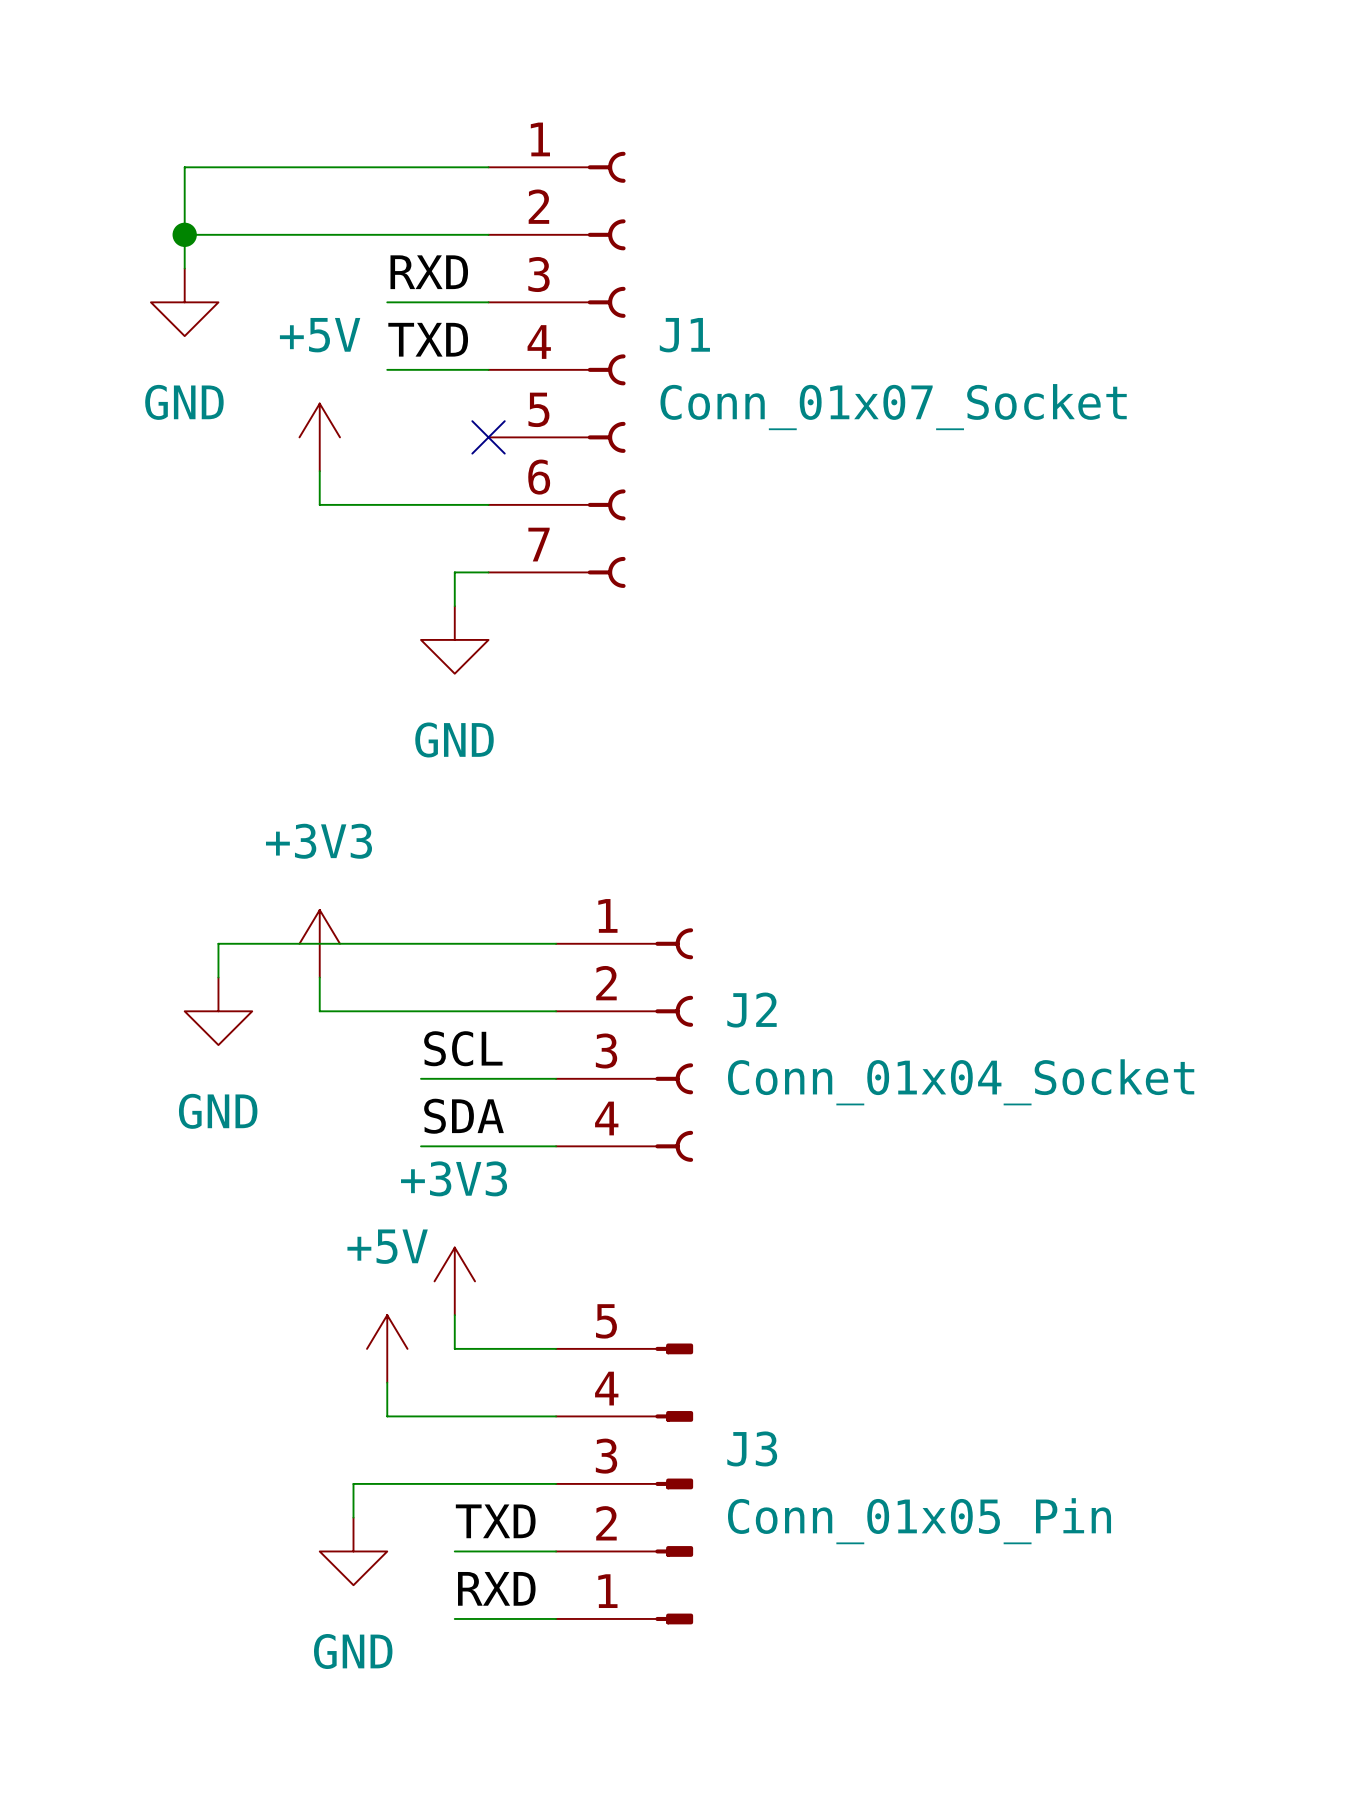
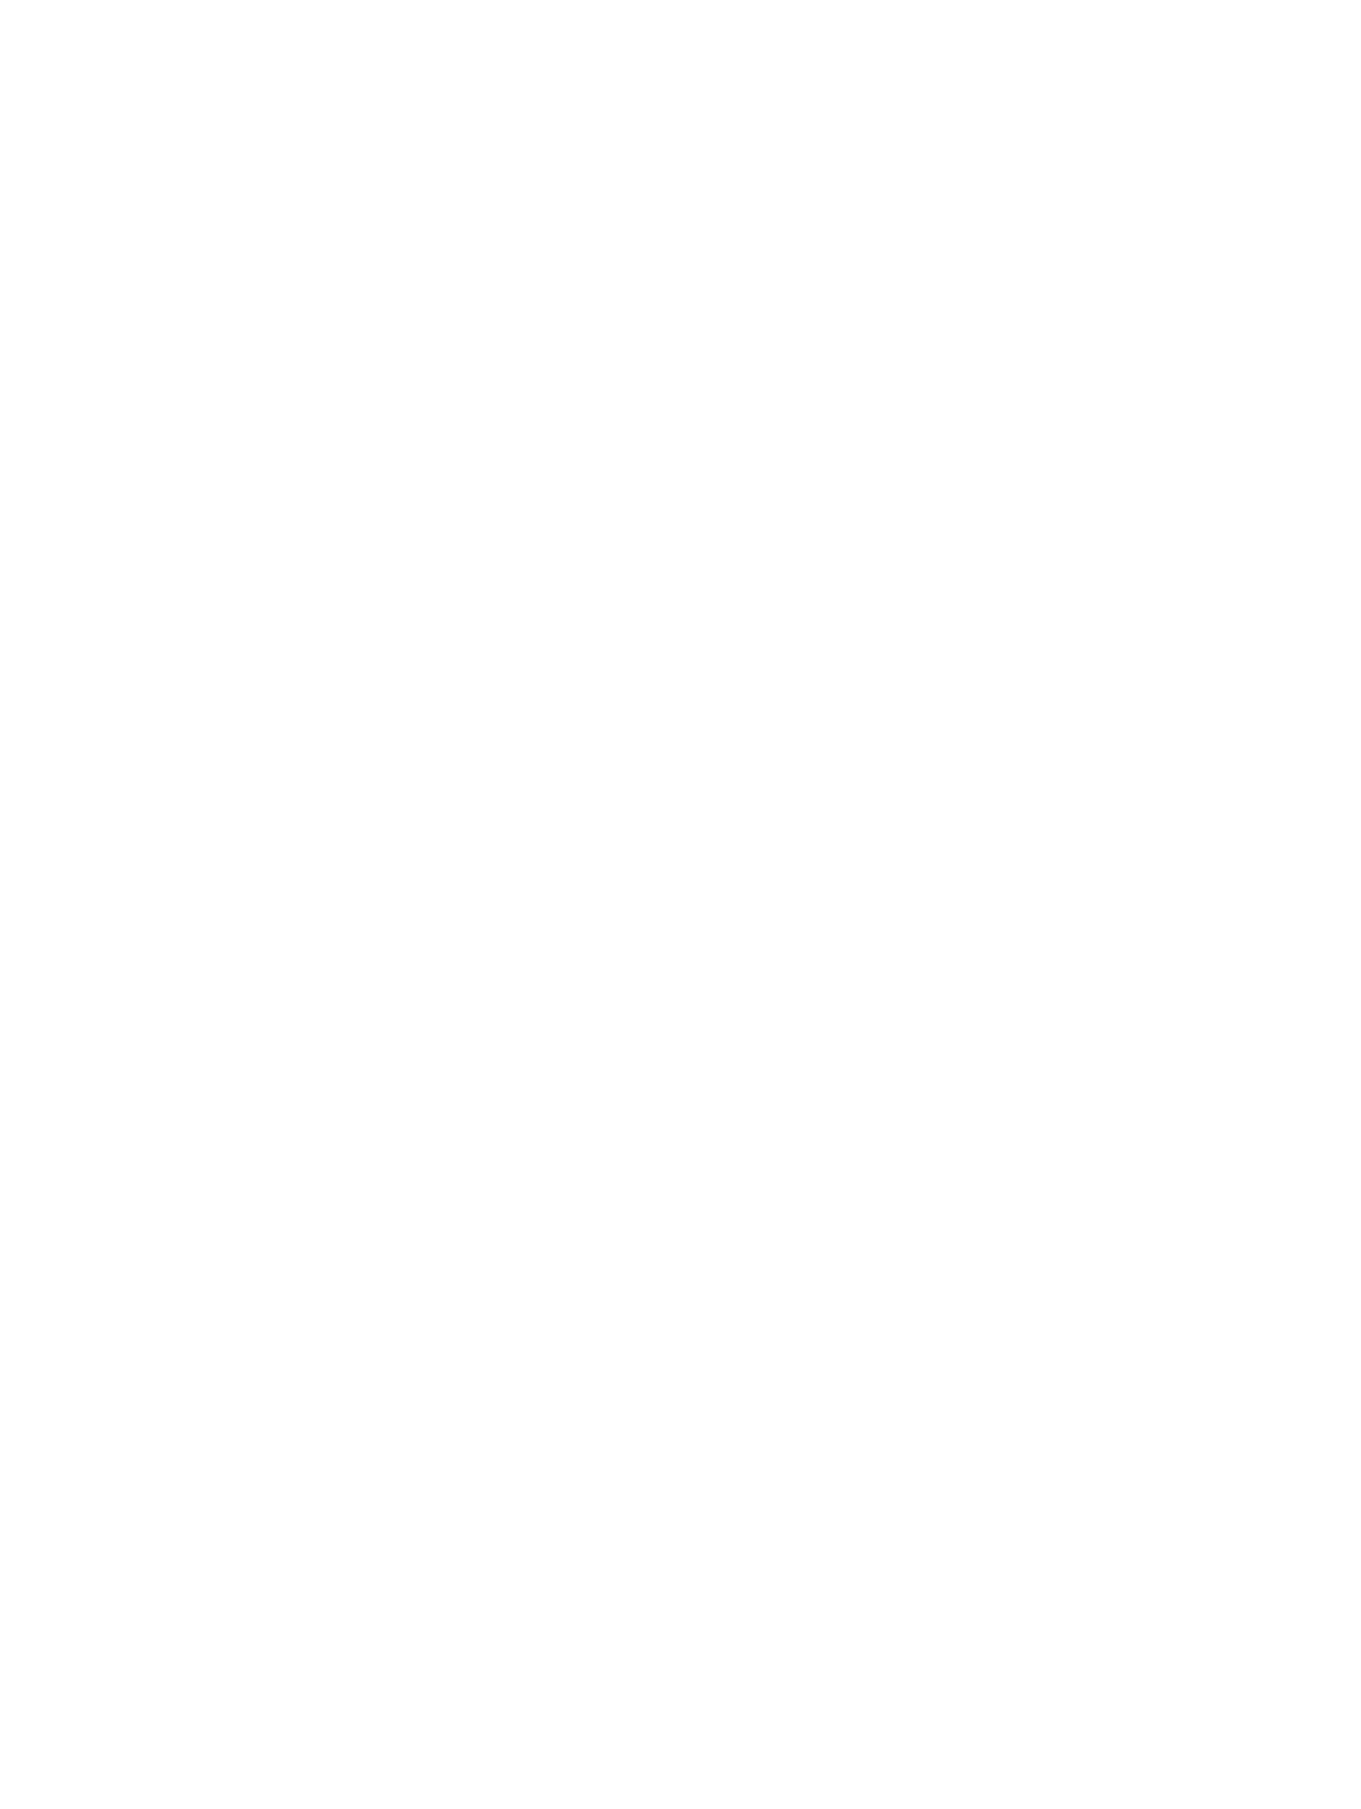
wire: (488, 167) (184, 167) (184, 268) -> none
wire: (184, 234) (488, 234) -> none
junction: (184, 234) -> none
label: RXD (429, 272) -> none
power symbol: GND (184, 302) -> none
wire: (387, 302) (488, 302) -> none
label: TXD (428, 339) -> none
wire: (387, 369) (488, 369) -> none
J1: Conn_01x07_Socket (557, 369) -> none
power symbol: +5V (319, 437) -> none
no-connect mark: (488, 437) -> none
wire: (319, 471) (319, 504) (488, 504) -> none
wire: (488, 572) (454, 572) (454, 606) -> none
power symbol: GND (454, 639) -> none
power symbol: +3V3 (319, 943) -> none
wire: (556, 943) (218, 943) (218, 977) -> none
wire: (319, 977) (319, 1011) (556, 1011) -> none
power symbol: GND (218, 1011) -> none
J2: Conn_01x04_Socket (624, 1045) -> none
label: SCL (463, 1048) -> none
wire: (421, 1078) (556, 1078) -> none
label: SDA (463, 1116) -> none
wire: (421, 1146) (556, 1146) -> none
power symbol: +3V3 (454, 1281) -> none
wire: (454, 1315) (454, 1348) (556, 1348) -> none
power symbol: +5V (387, 1348) -> none
wire: (387, 1382) (387, 1416) (556, 1416) -> none
wire: (556, 1483) (353, 1483) (353, 1517) -> none
J3: Conn_01x05_Pin (624, 1483) -> none
label: TXD (495, 1521) -> none
power symbol: GND (353, 1551) -> none
wire: (454, 1551) (556, 1551) -> none
label: RXD (496, 1588) -> none
wire: (454, 1618) (556, 1618) -> none

